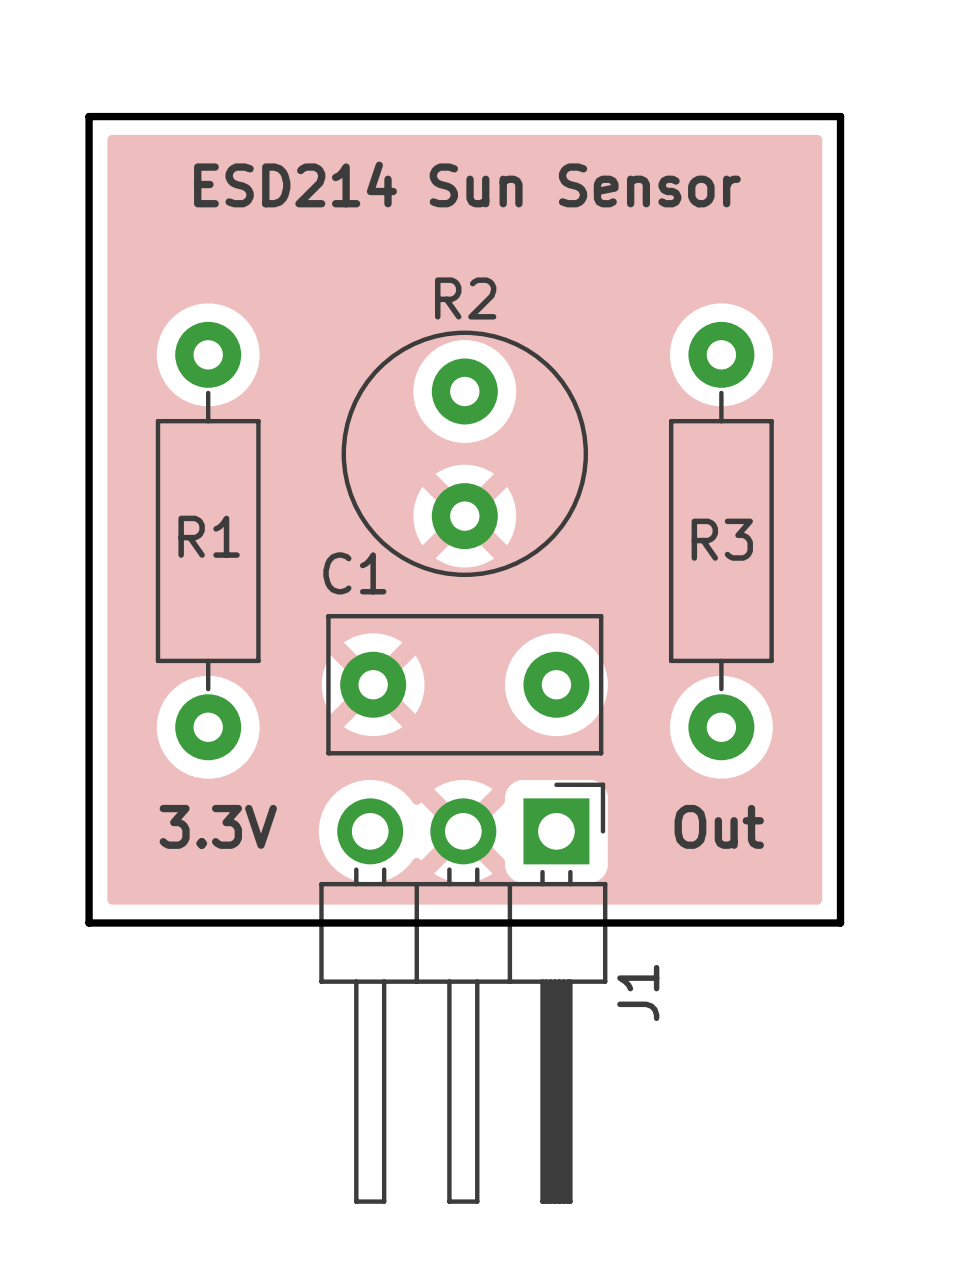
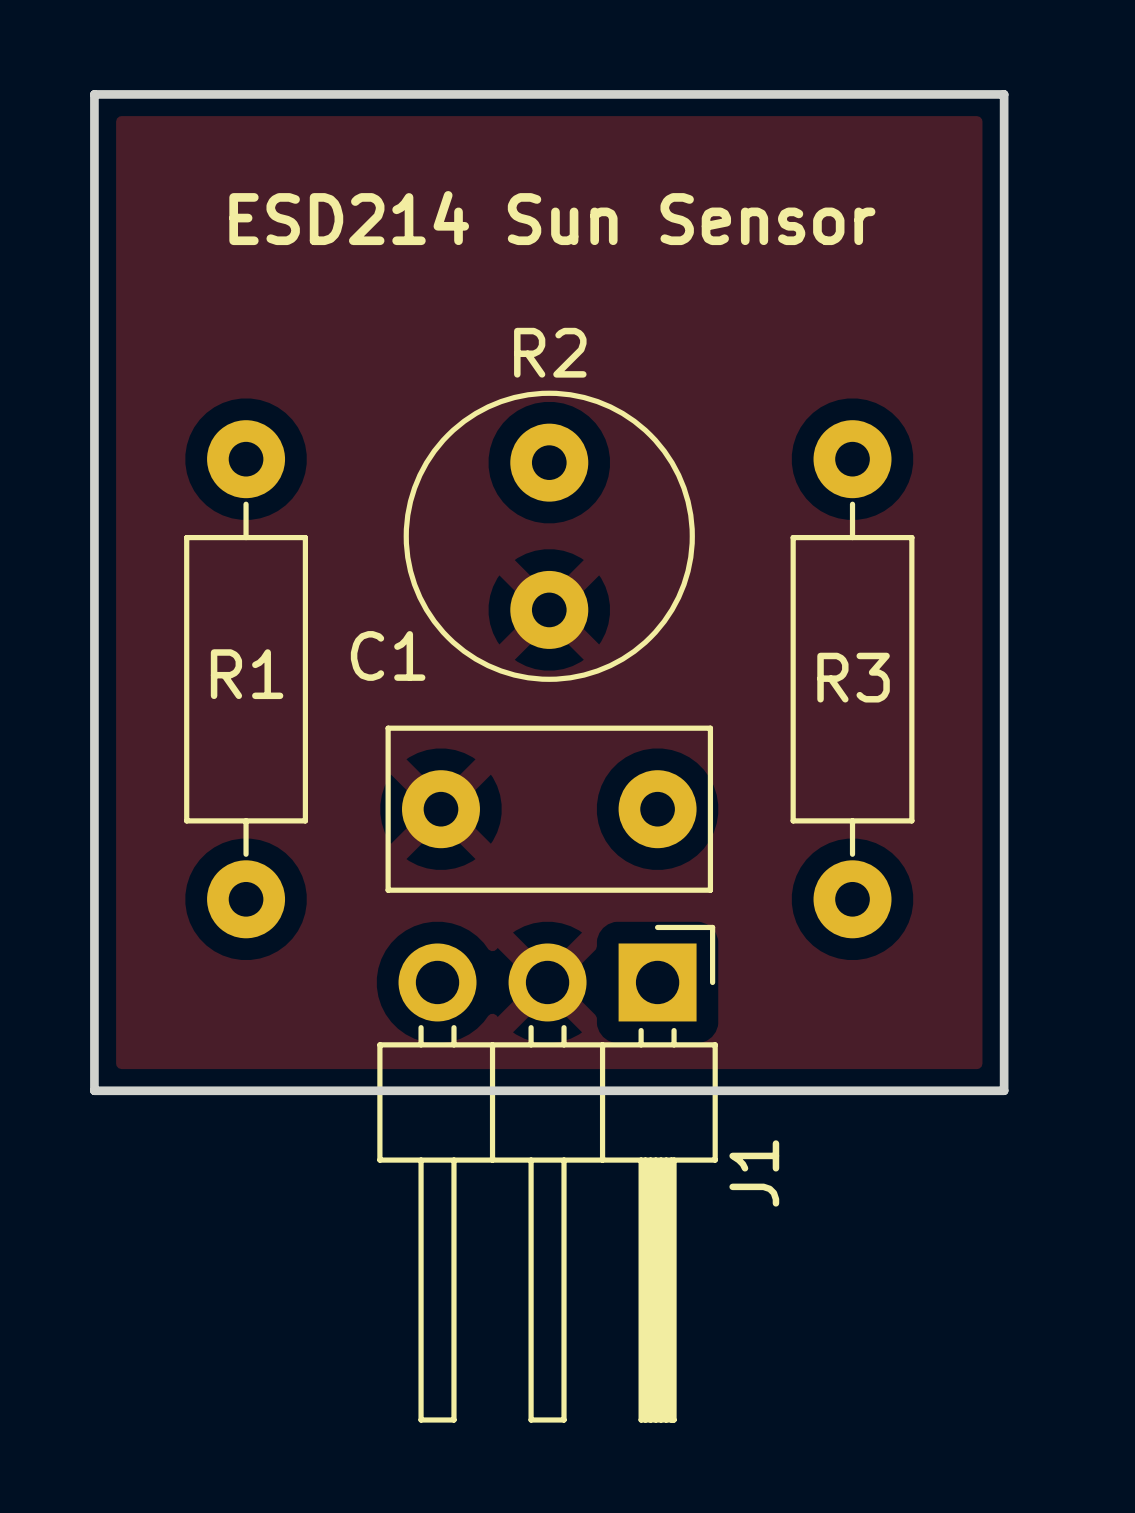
R1 position: (208, 541) -> (246, 679)
R3 position: (721, 541) -> (852, 679)
C1 name position: C1 (354, 573) -> C1 (388, 655)
text: 3.3V (218, 826) -> none
text: Out (719, 826) -> none
board edge: (89, 923) (89, 116) (840, 116) (840, 923) -> (105, 1090) (94, 1090) (94, 94) (1004, 94) (1004, 1090) (993, 1090)

